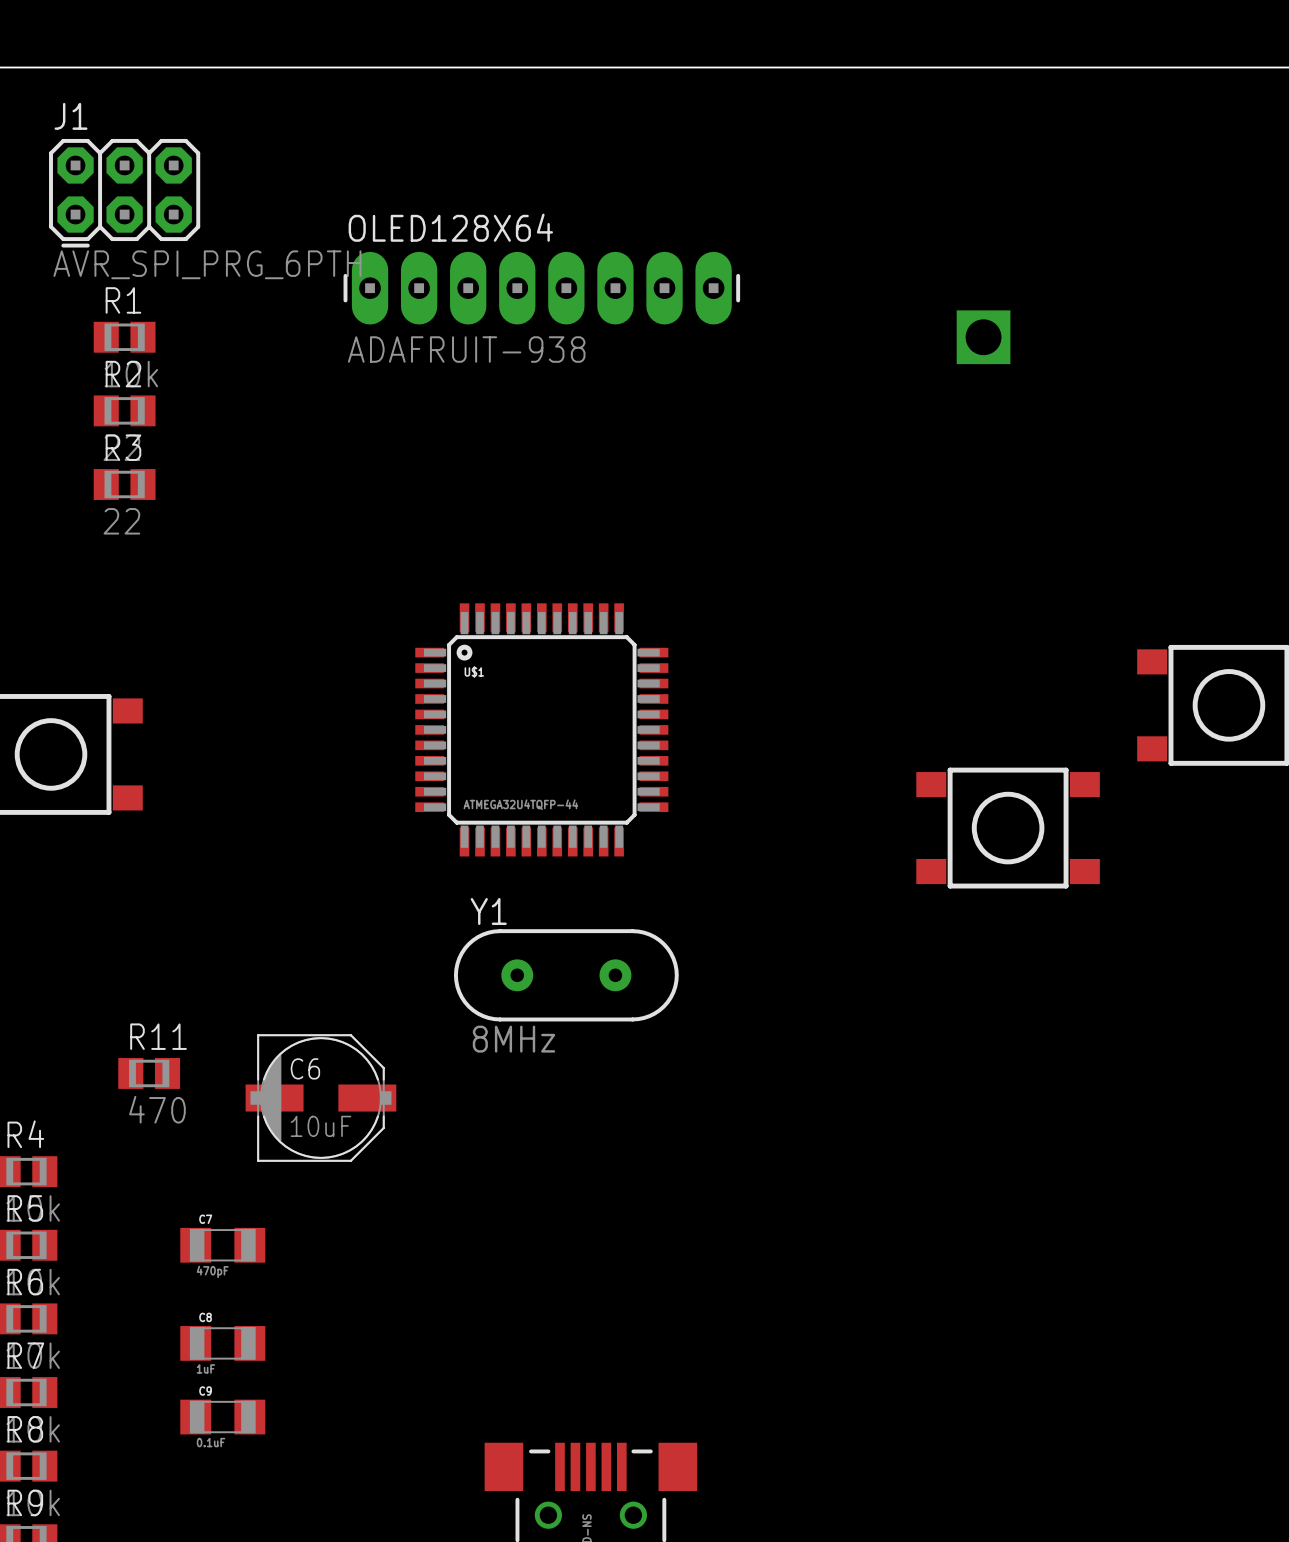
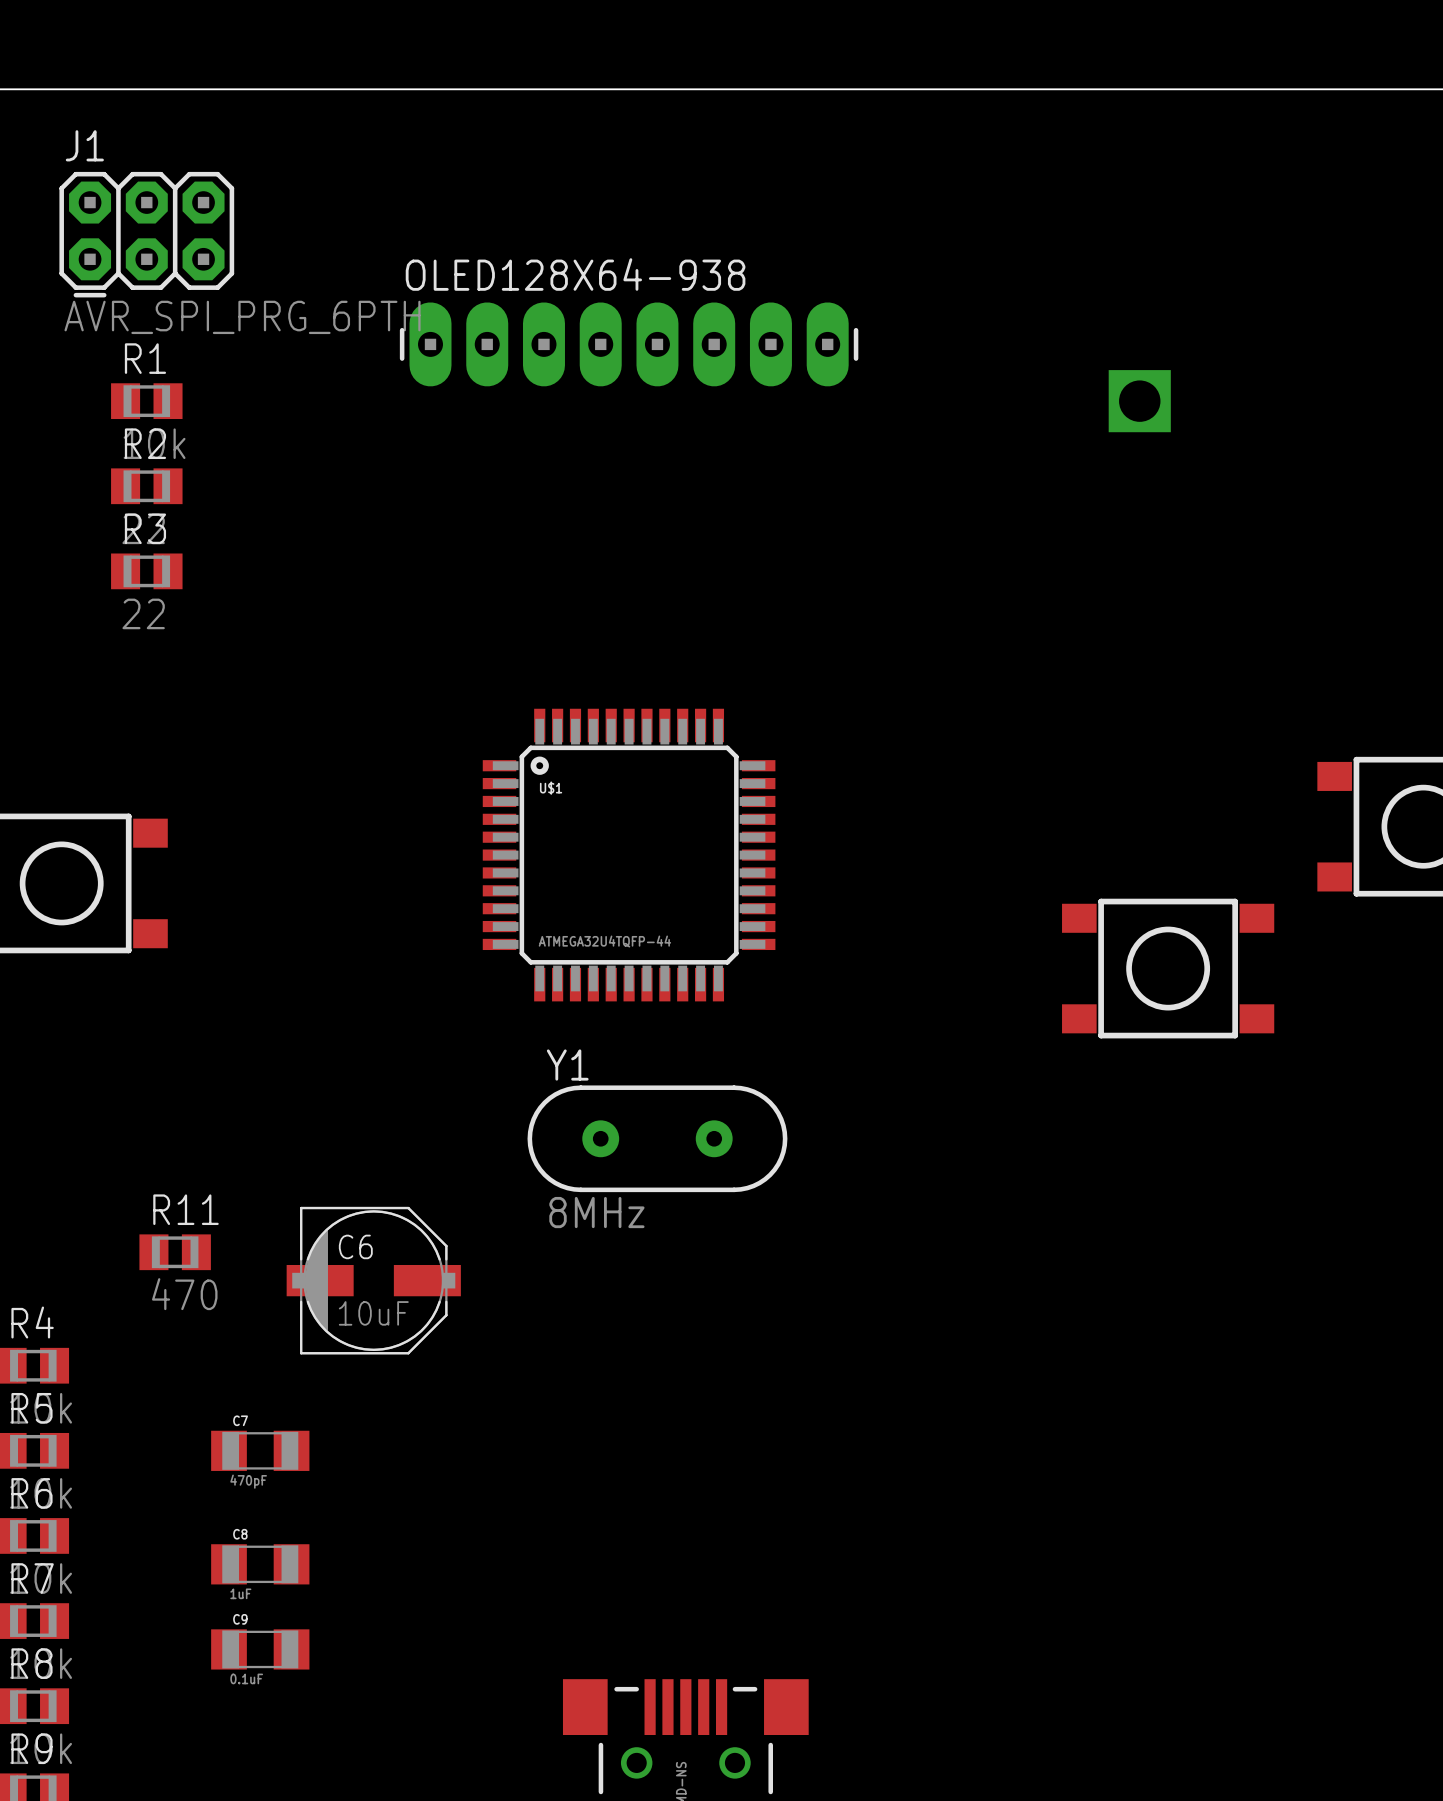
OLED128X64 name: OLED128X64 (450, 227) -> OLED128X64-938 (575, 274)
OLED128X64 value: ADAFRUIT-938 (466, 349) -> none

